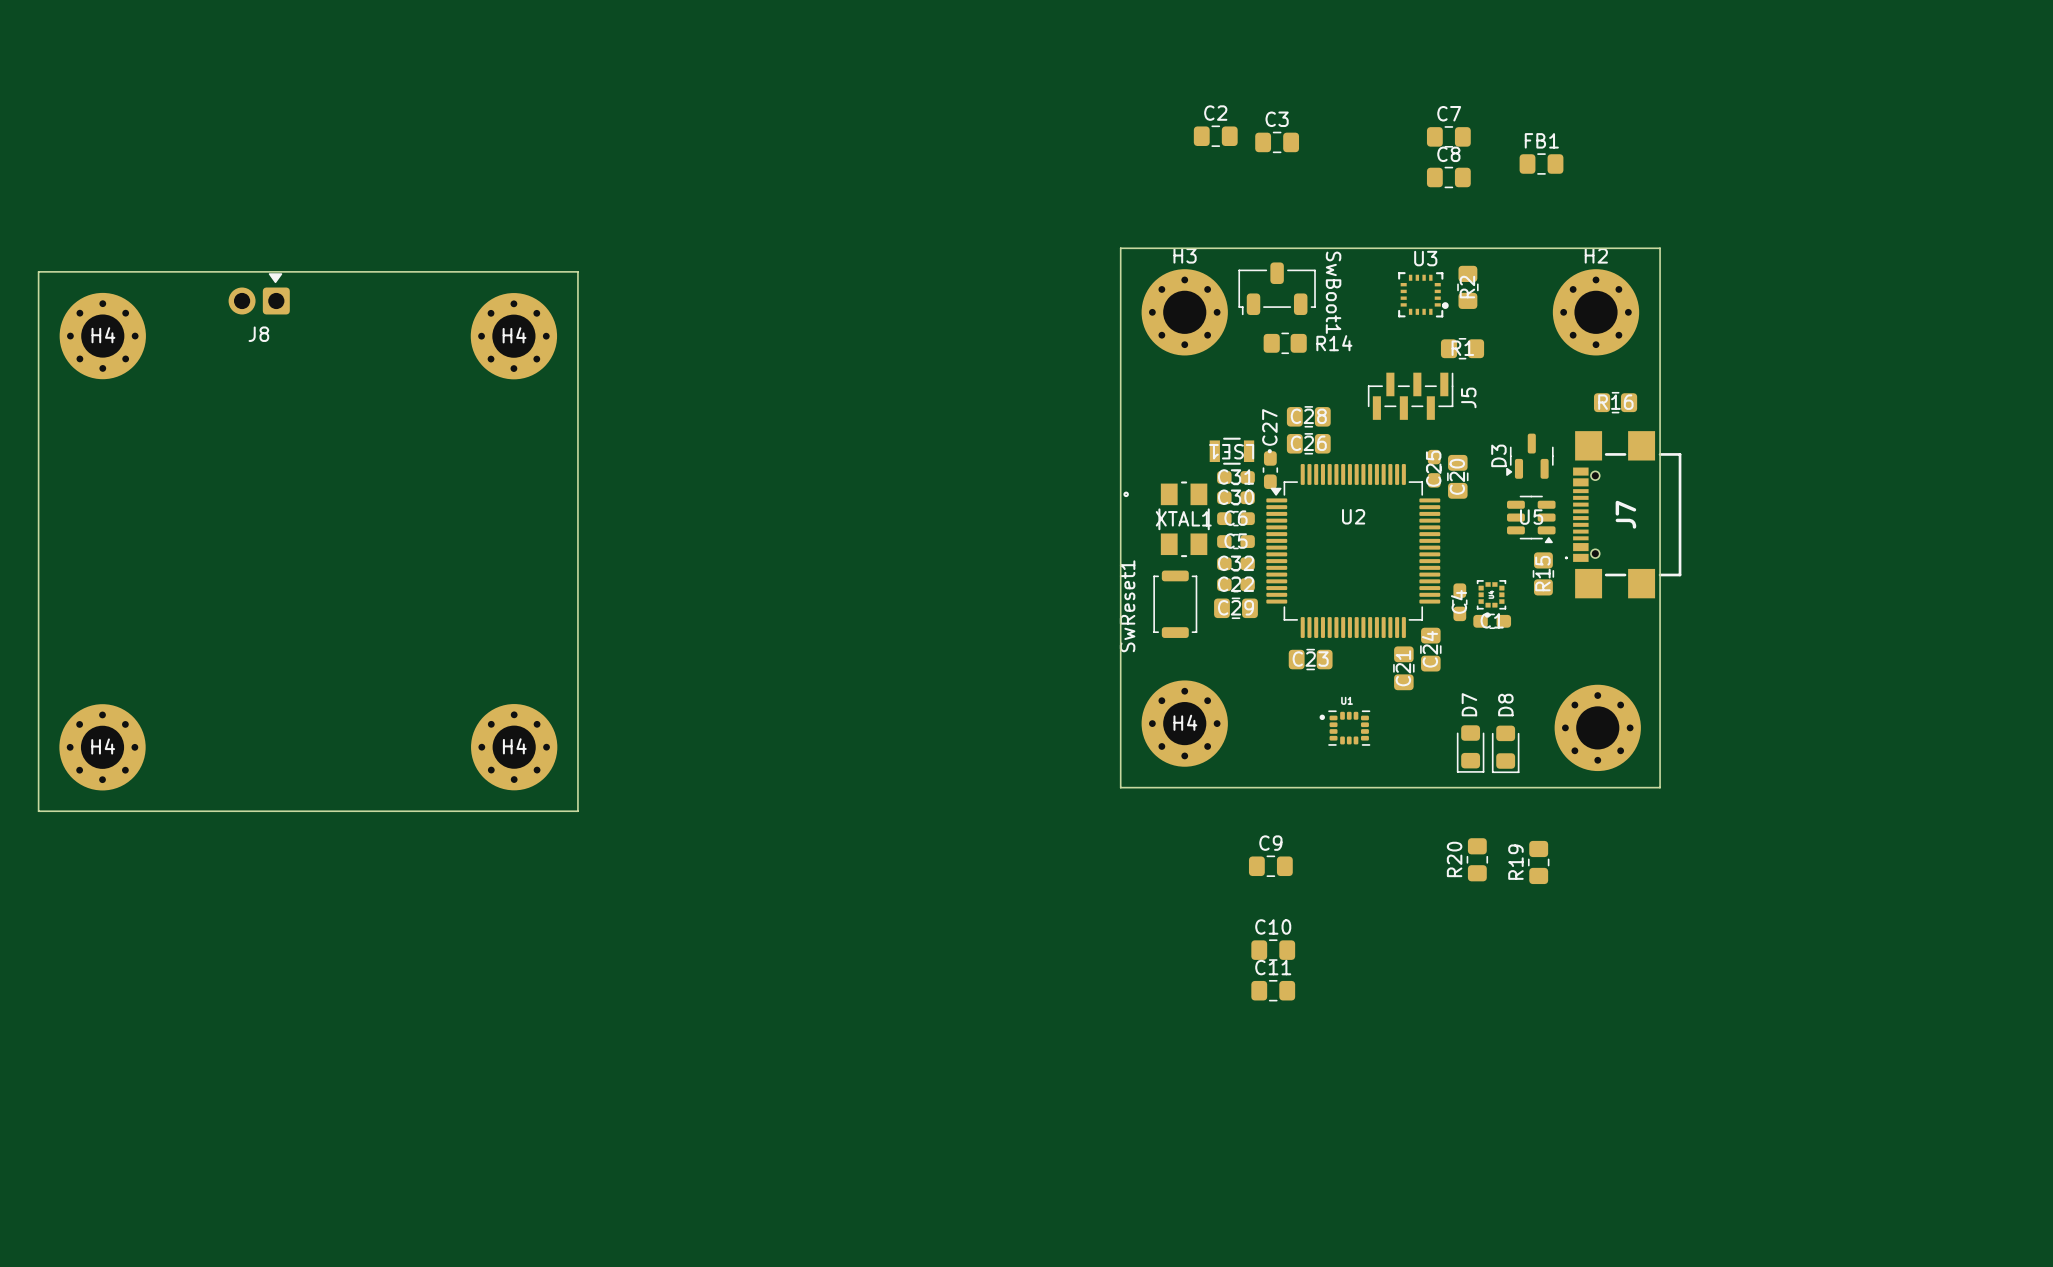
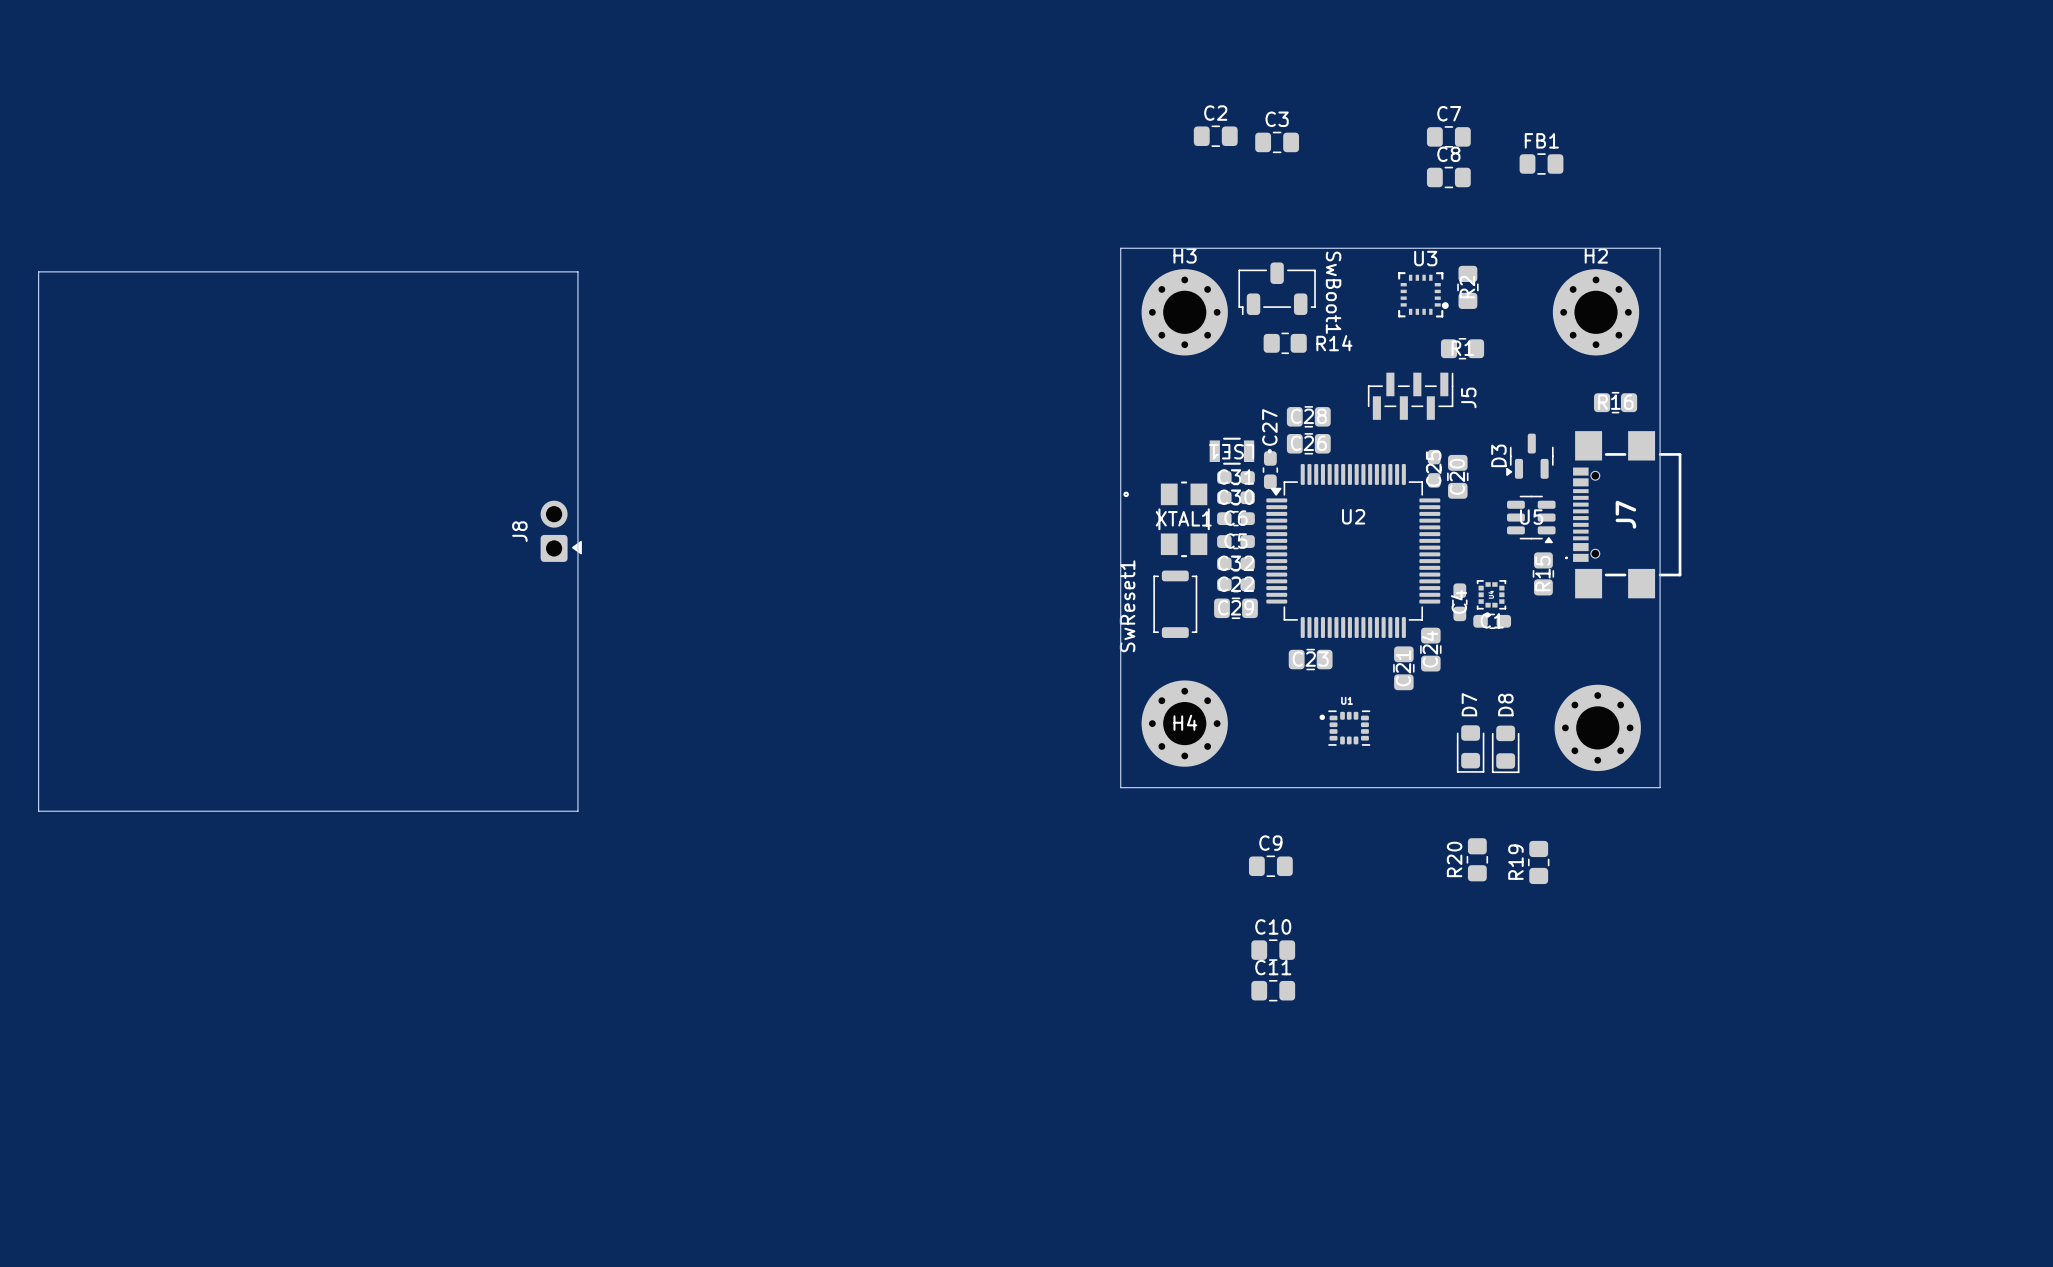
J8 rotation: 0° (259, 293) -> 90° clockwise (561, 531)
J8 position: (259, 293) -> (561, 531)
H4: (102, 336) -> none
H4: (513, 336) -> none
H4: (102, 747) -> none
H4: (514, 747) -> none

